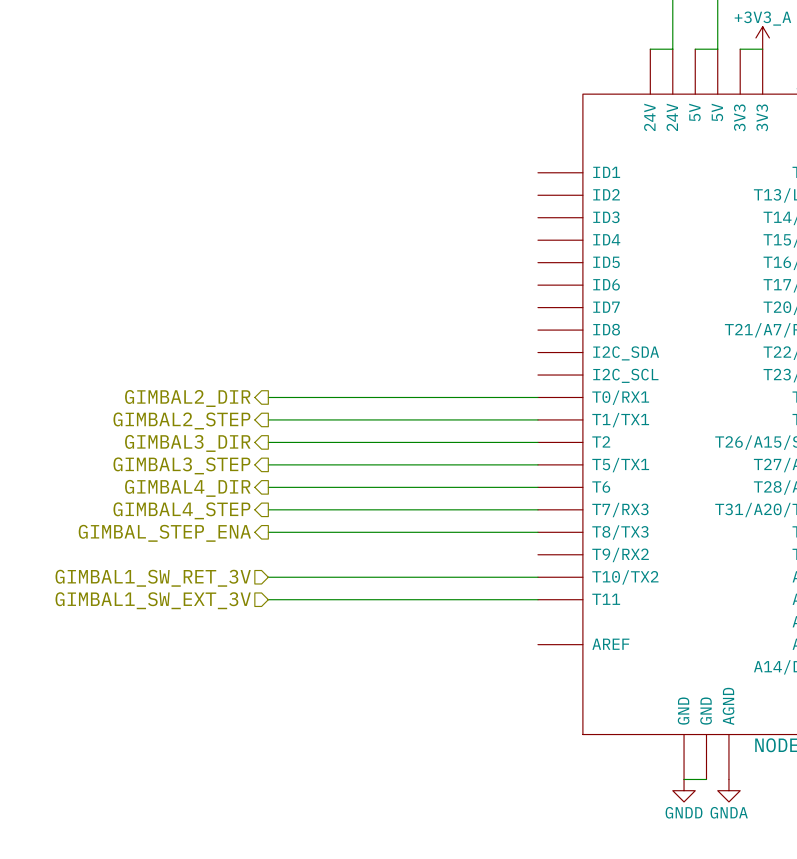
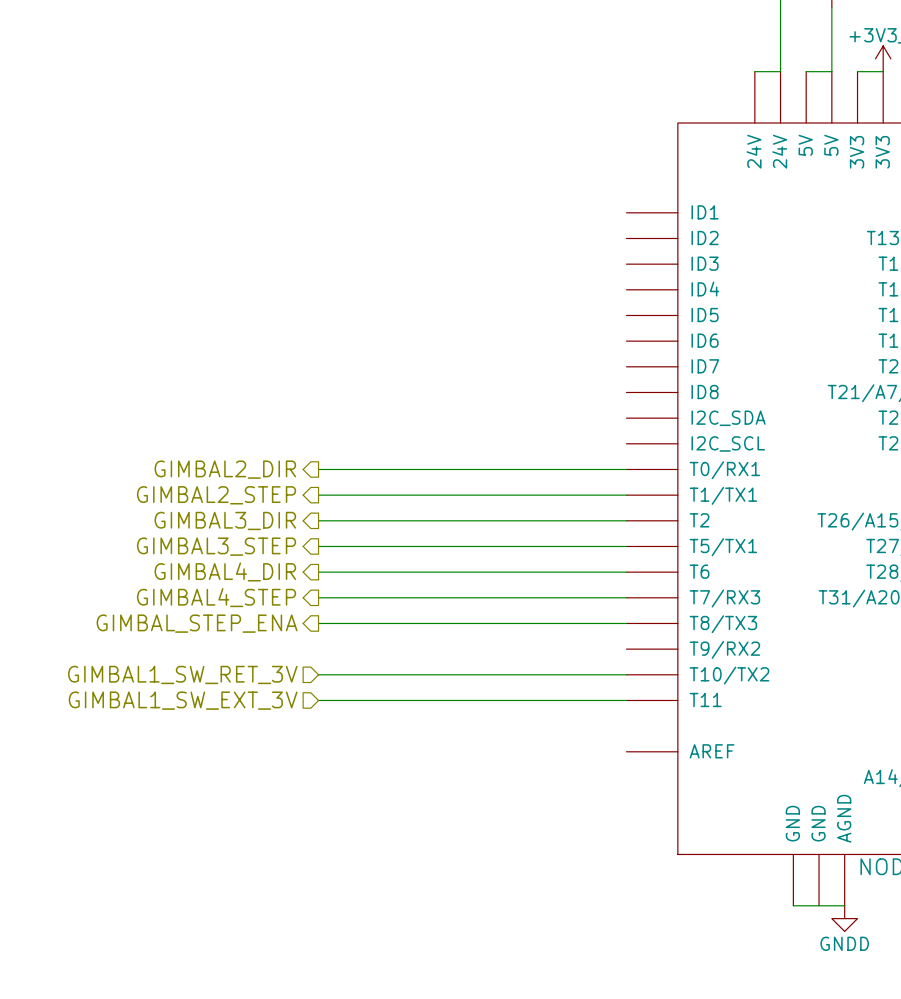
wire: none -> (819, 905) (844, 905)
power symbol: GNDD (684, 790) -> none
power symbol: GNDA (728, 790) -> GNDD (844, 918)

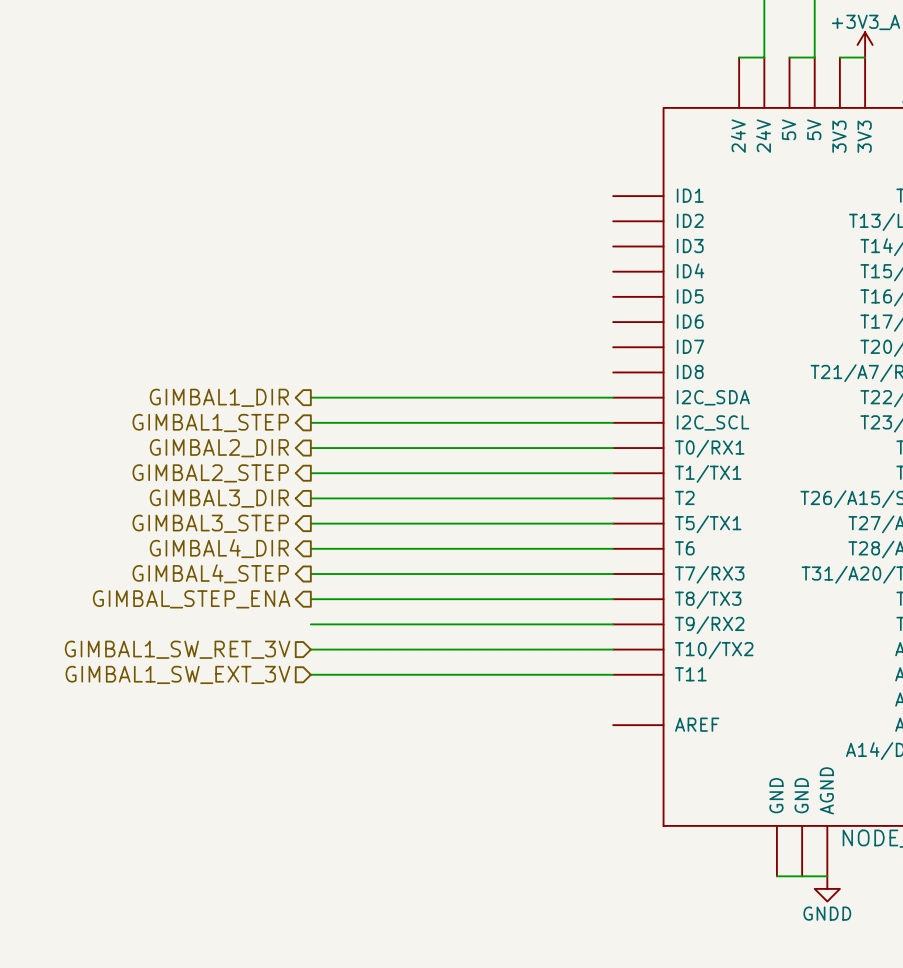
hierarchical label: none -> GIMBAL1_DIR (219, 397)
wire: none -> (310, 397) (613, 397)
hierarchical label: none -> GIMBAL1_STEP (210, 423)
wire: none -> (310, 422) (613, 422)
wire: none -> (310, 624) (613, 624)

